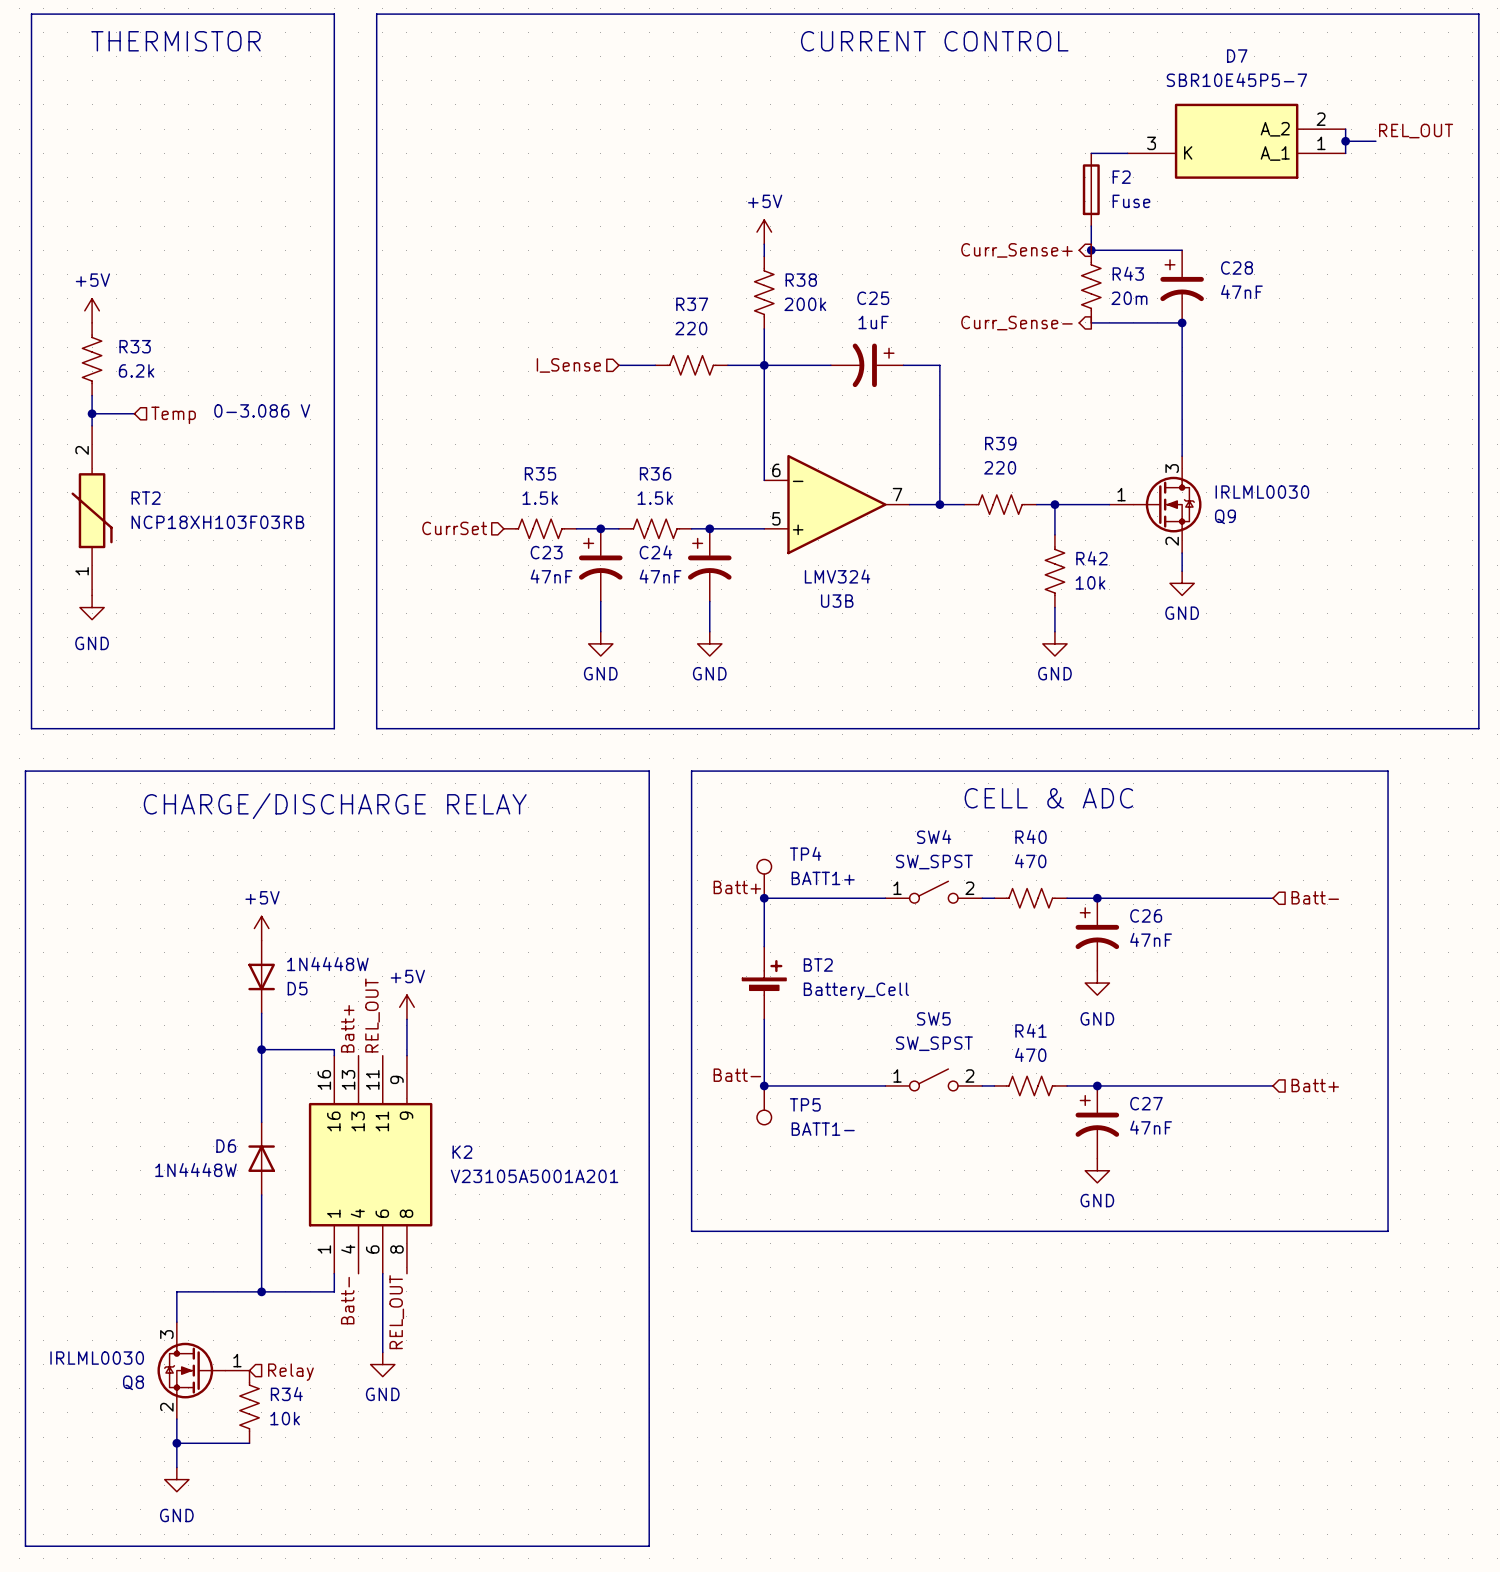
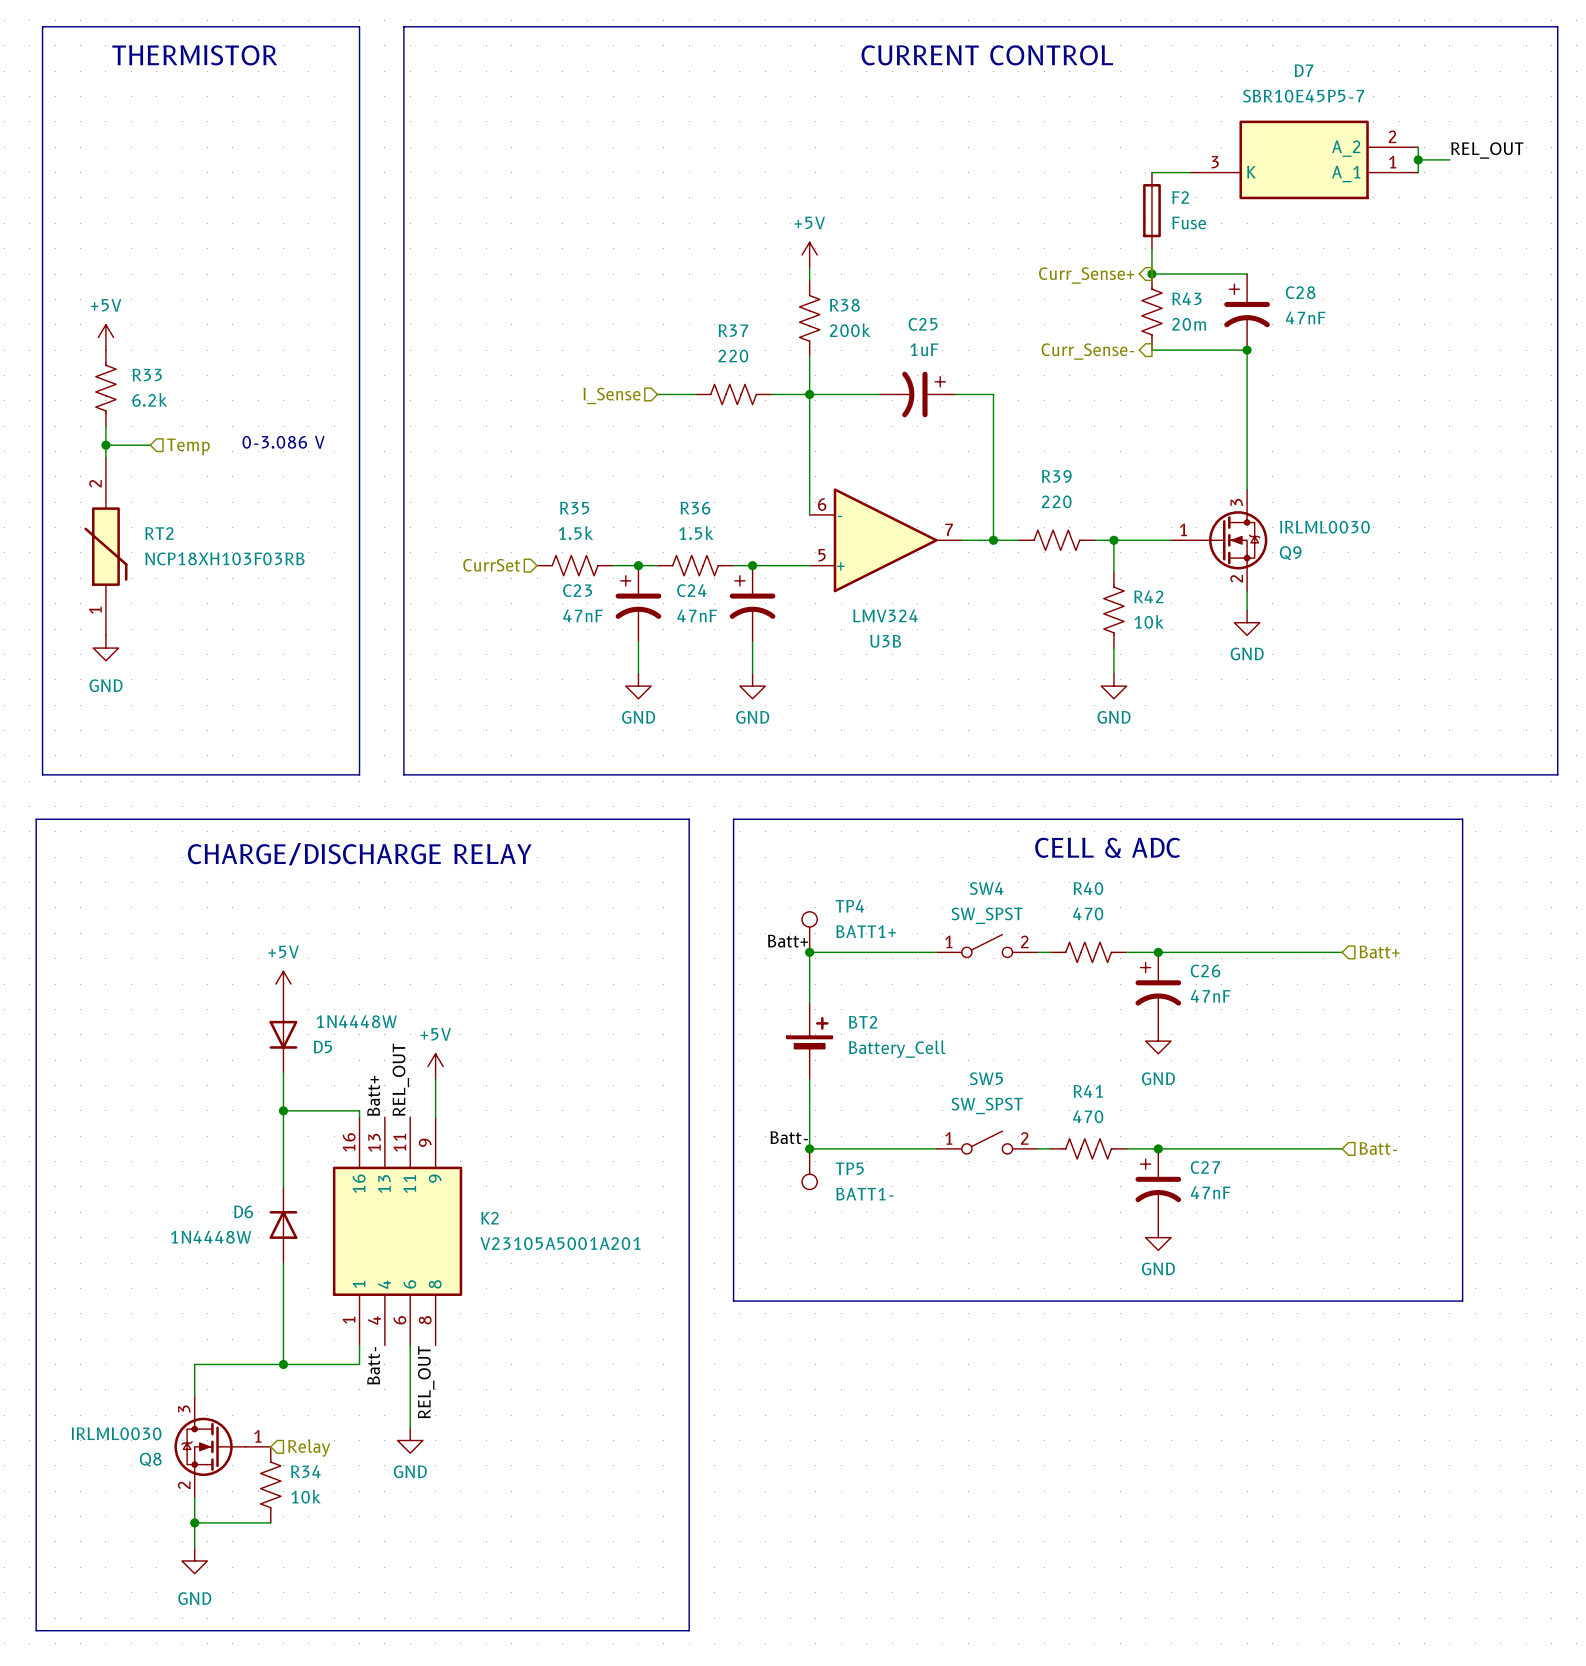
hierarchical label: Batt- (1315, 897) -> Batt+ (1379, 952)
hierarchical label: Batt+ (1315, 1085) -> Batt- (1378, 1148)

